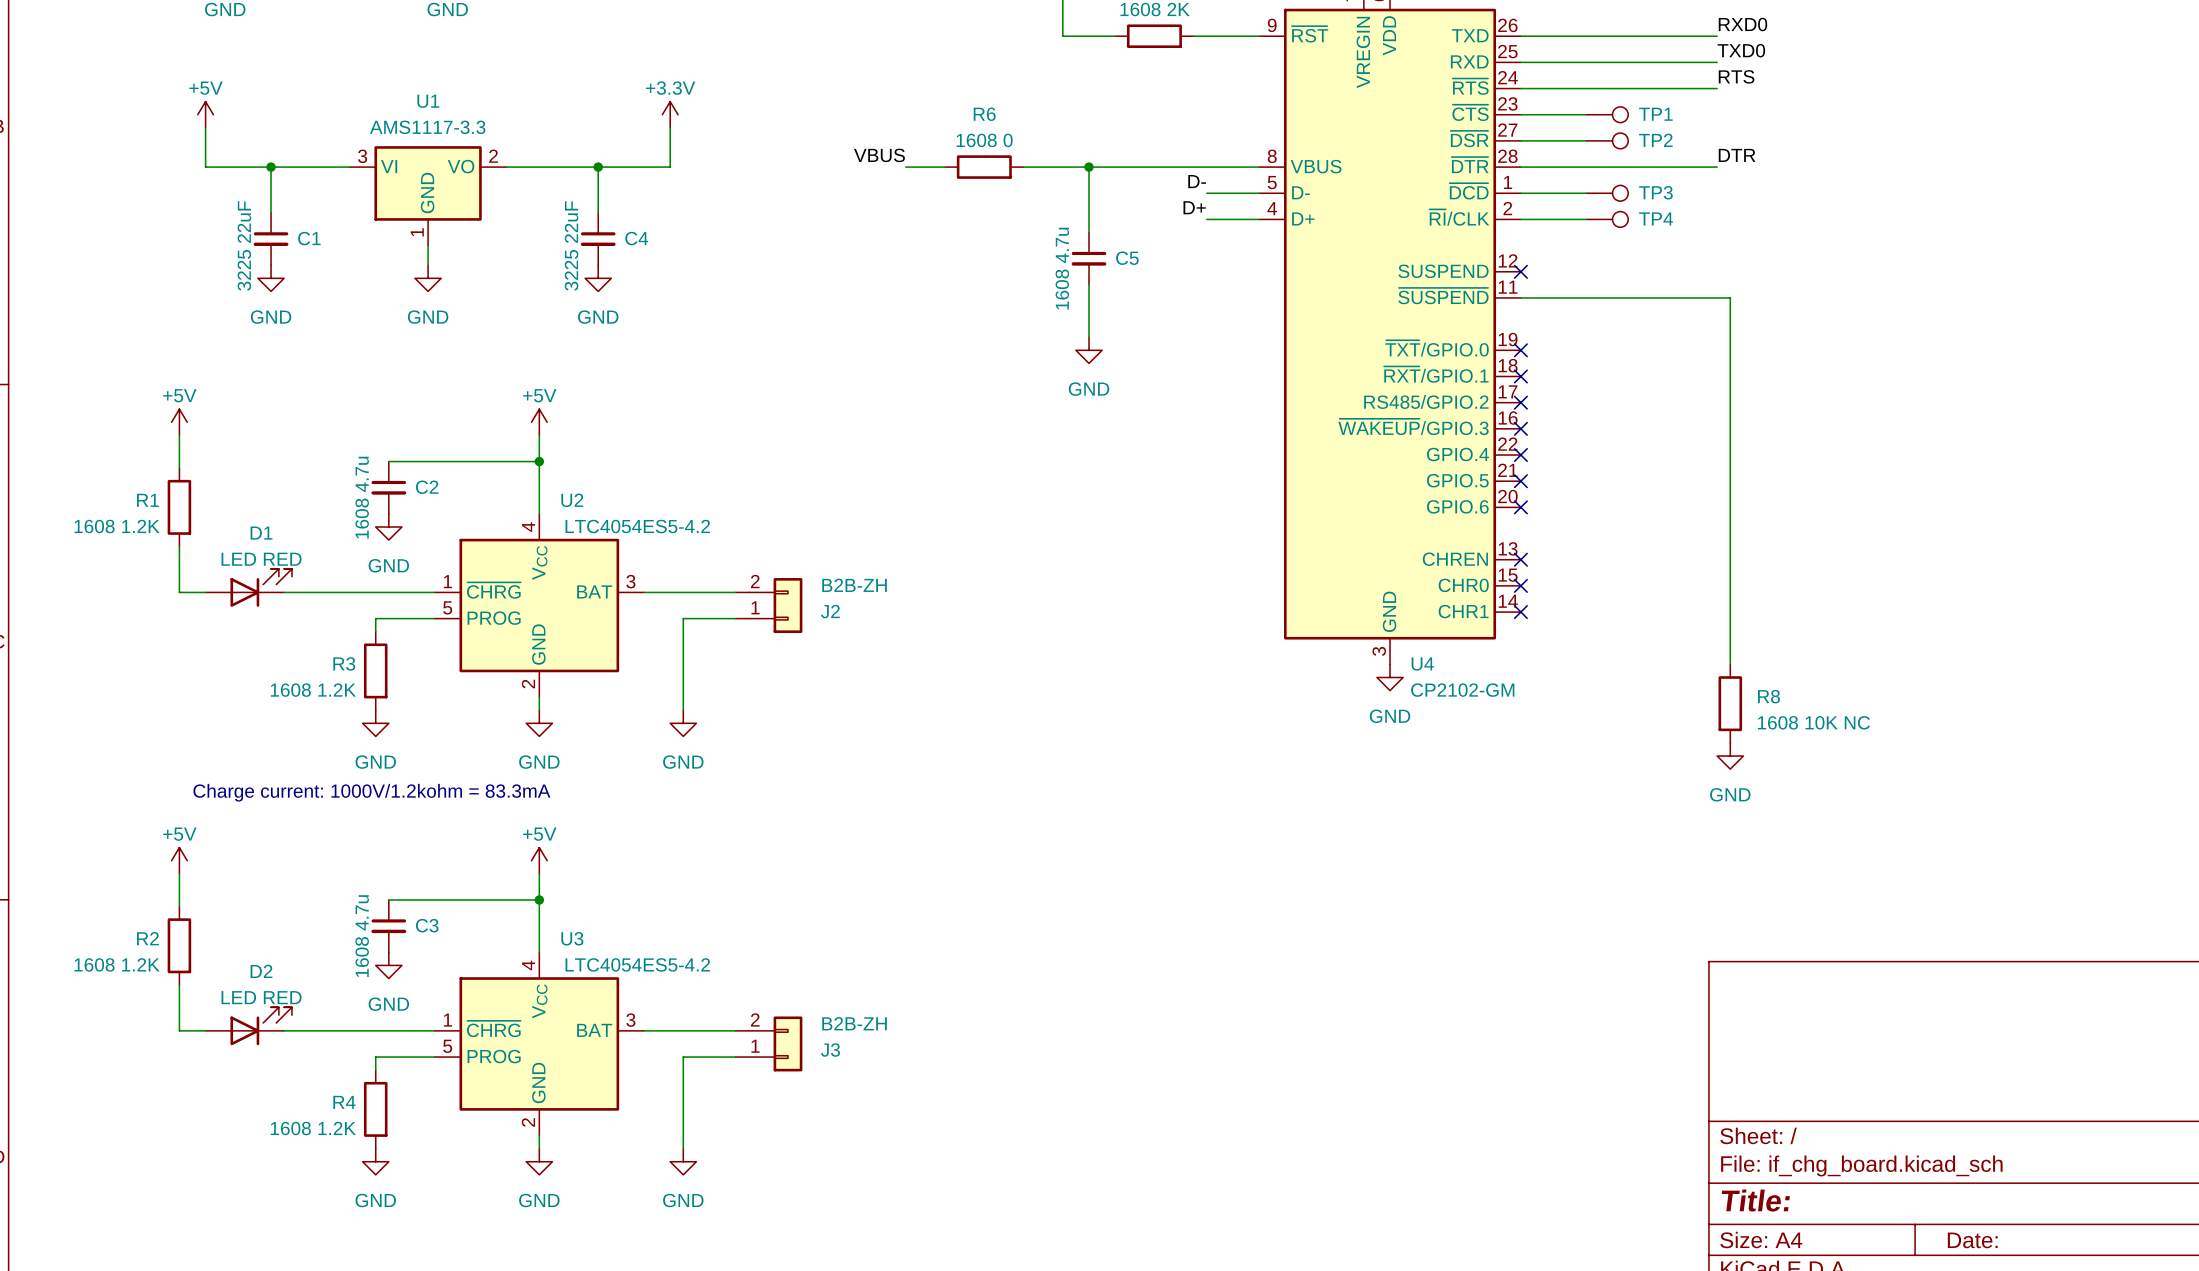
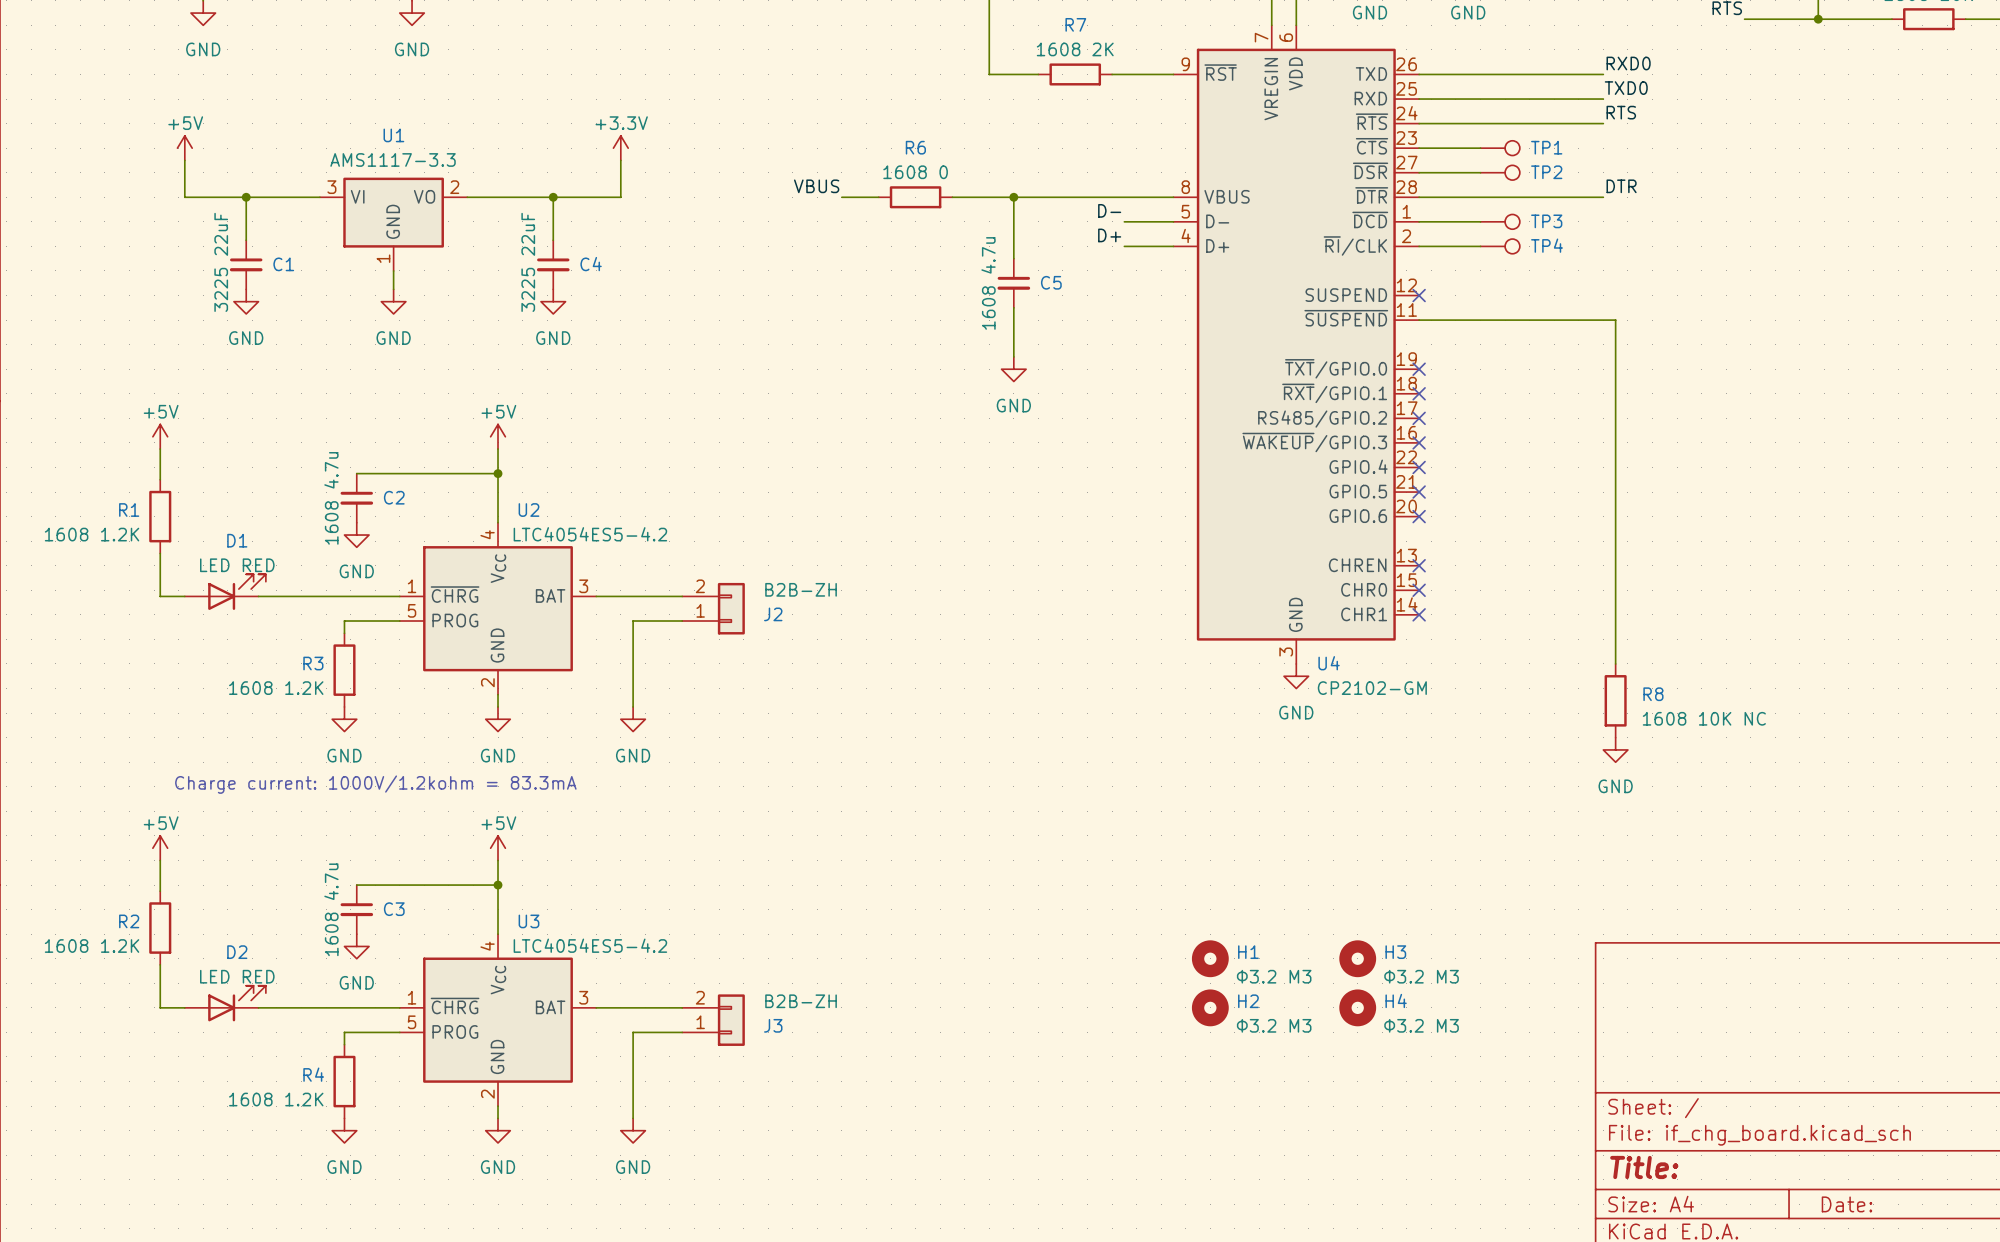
H1: none -> Φ3.2 M3 (1210, 958)
H3: none -> Φ3.2 M3 (1357, 958)
H2: none -> Φ3.2 M3 (1210, 1007)
H4: none -> Φ3.2 M3 (1357, 1007)

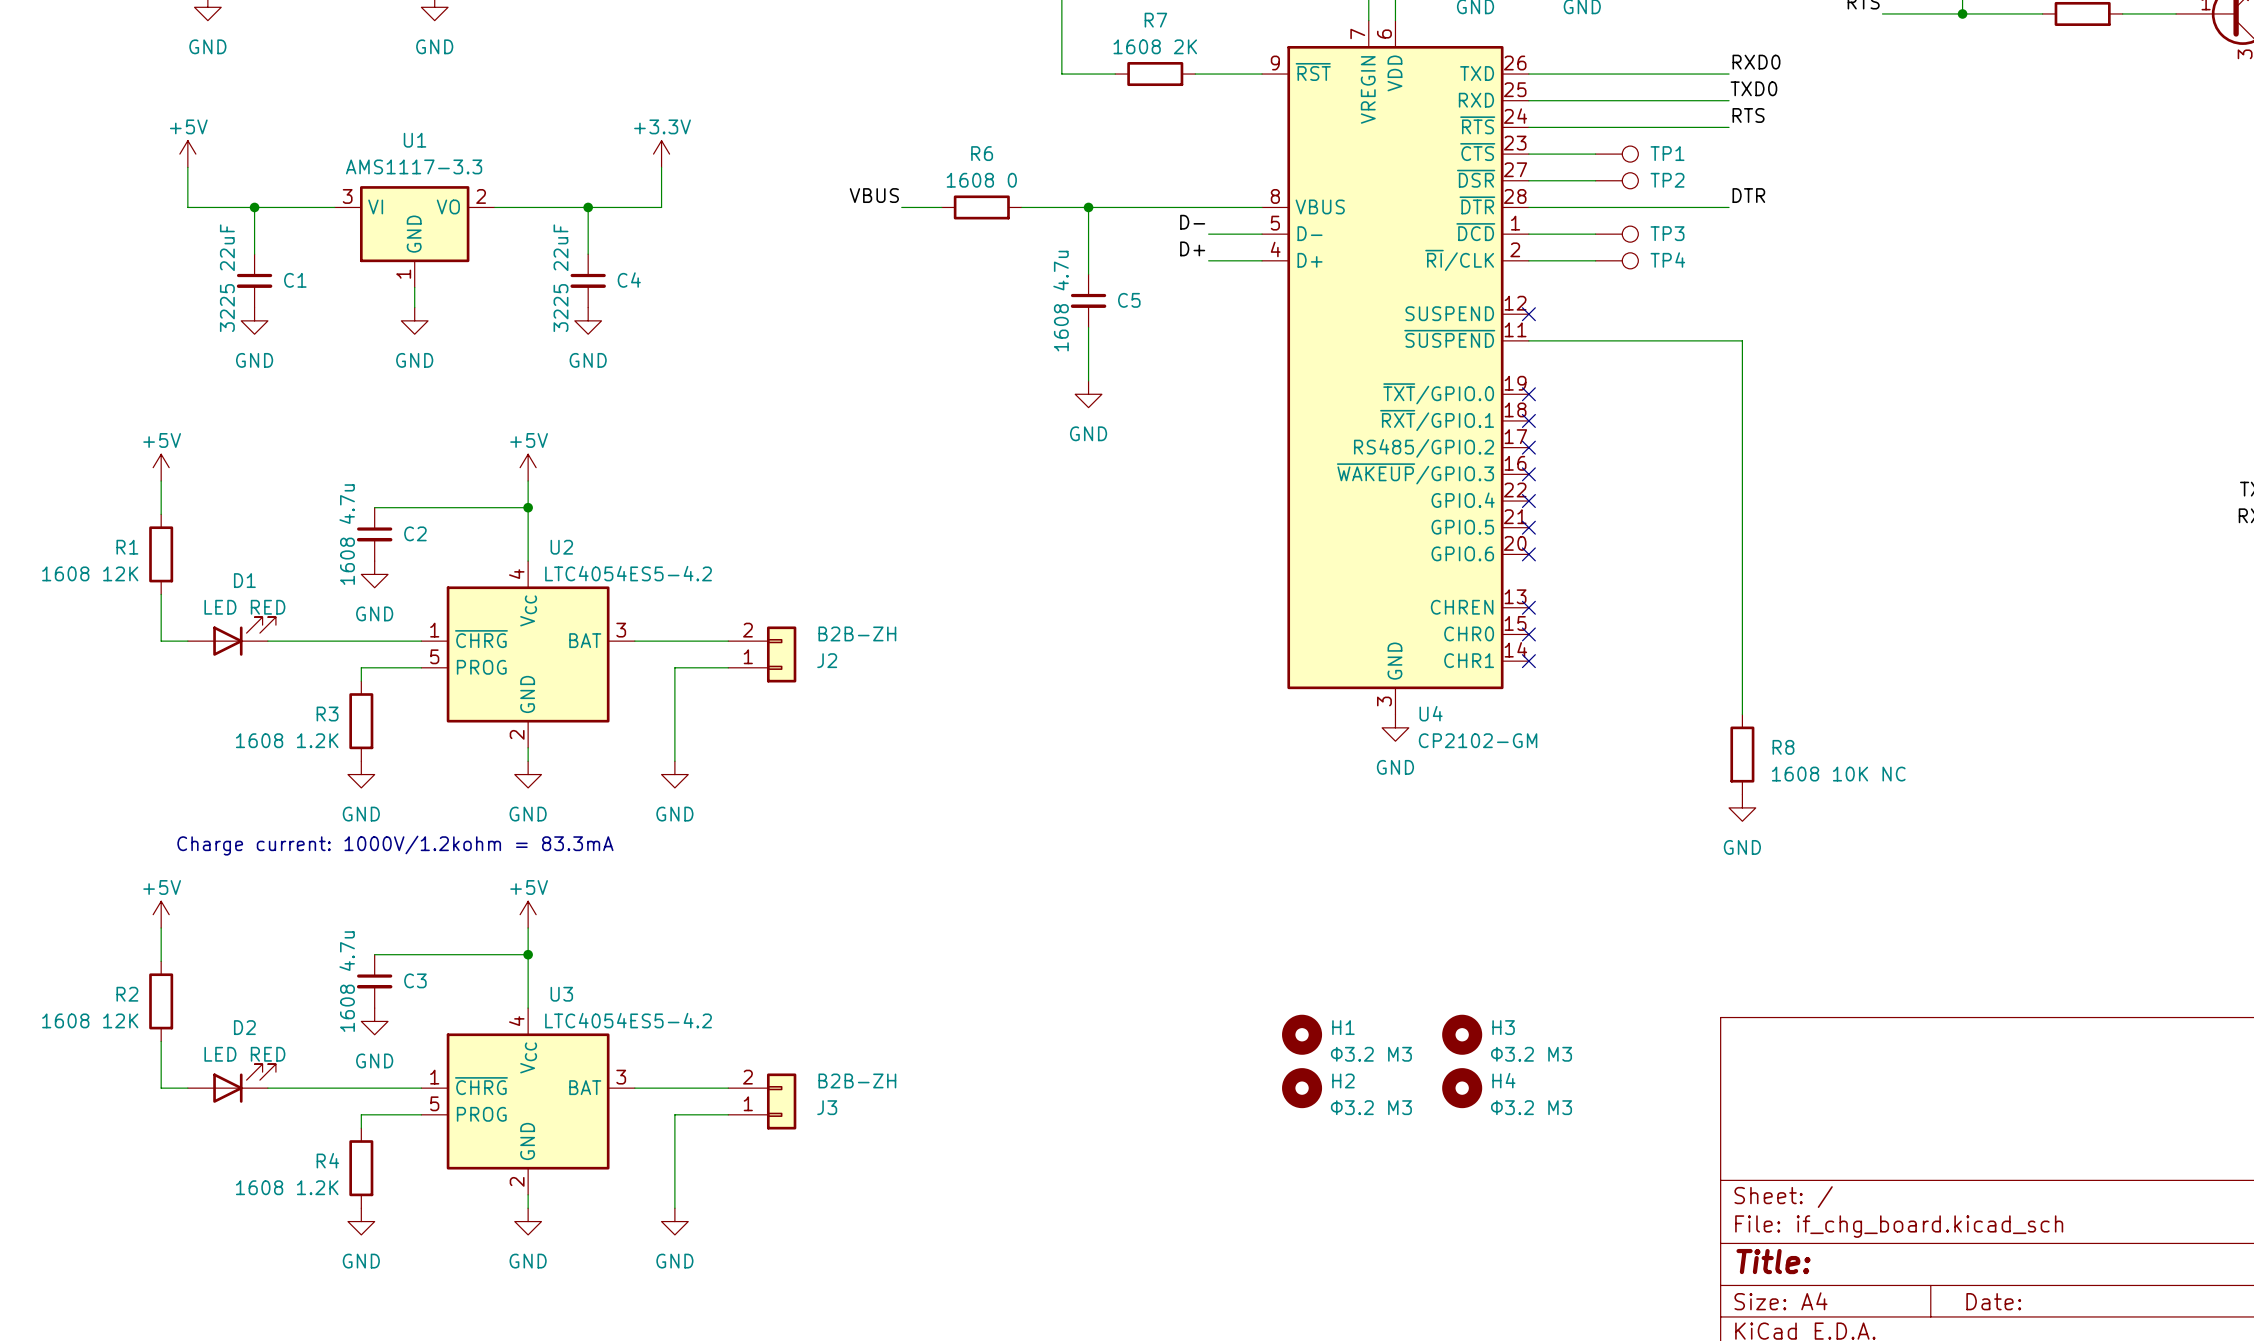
R1 value: 1608 1.2K (92, 534) -> 1608 12K (90, 573)
R2 value: 1608 1.2K (92, 946) -> 1608 12K (90, 1020)

